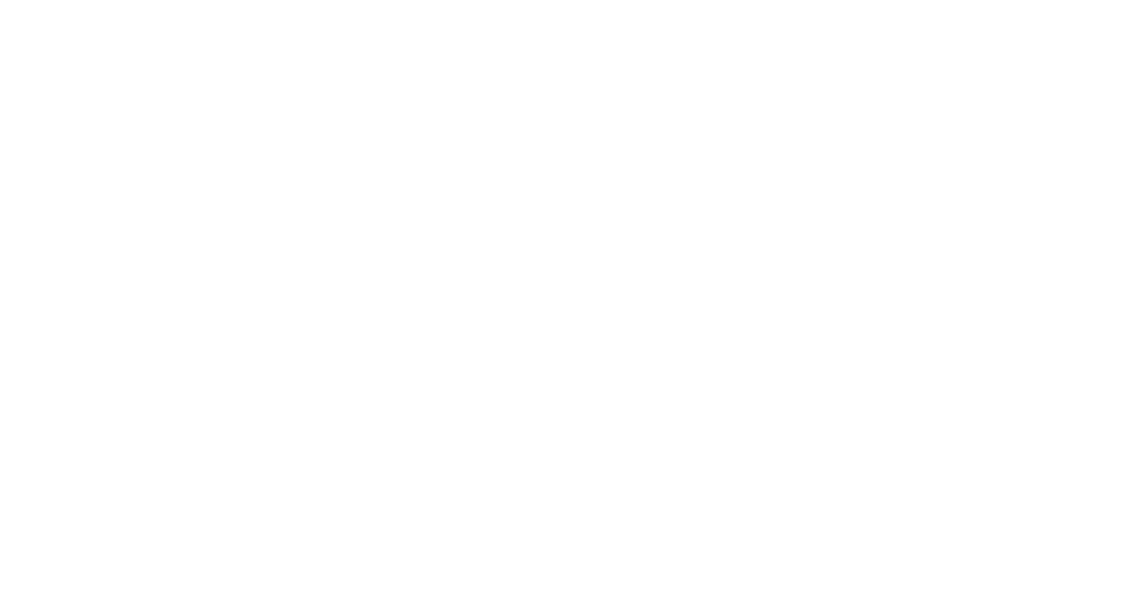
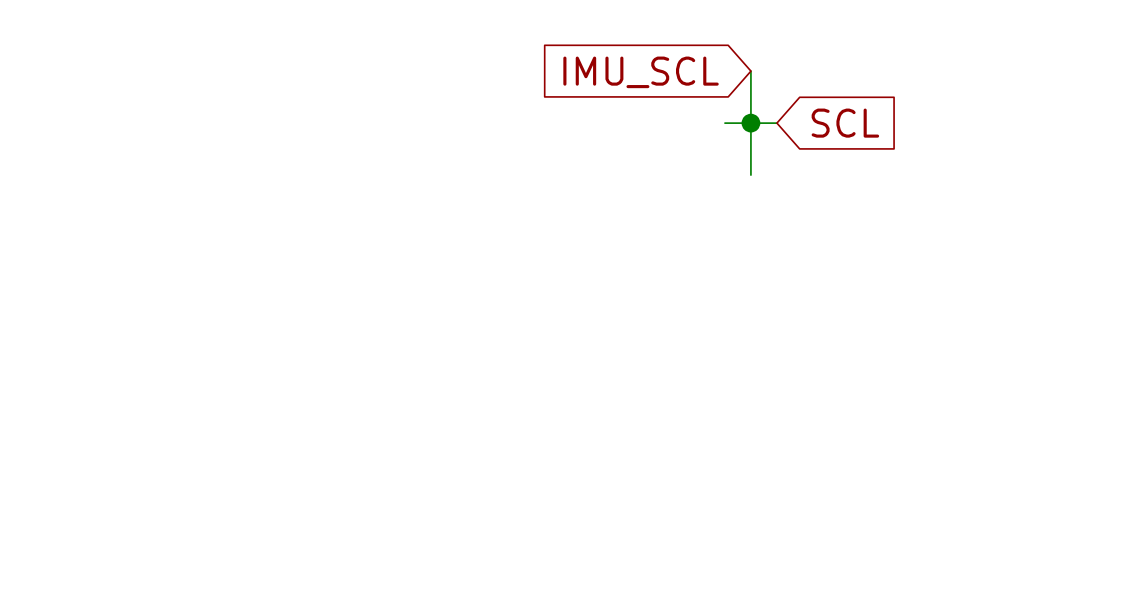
wire: none -> (750, 71) (750, 175)
global label: none -> IMU_SCL (641, 72)
wire: none -> (724, 123) (776, 123)
junction: none -> (750, 123)
global label: none -> SCL (845, 123)

